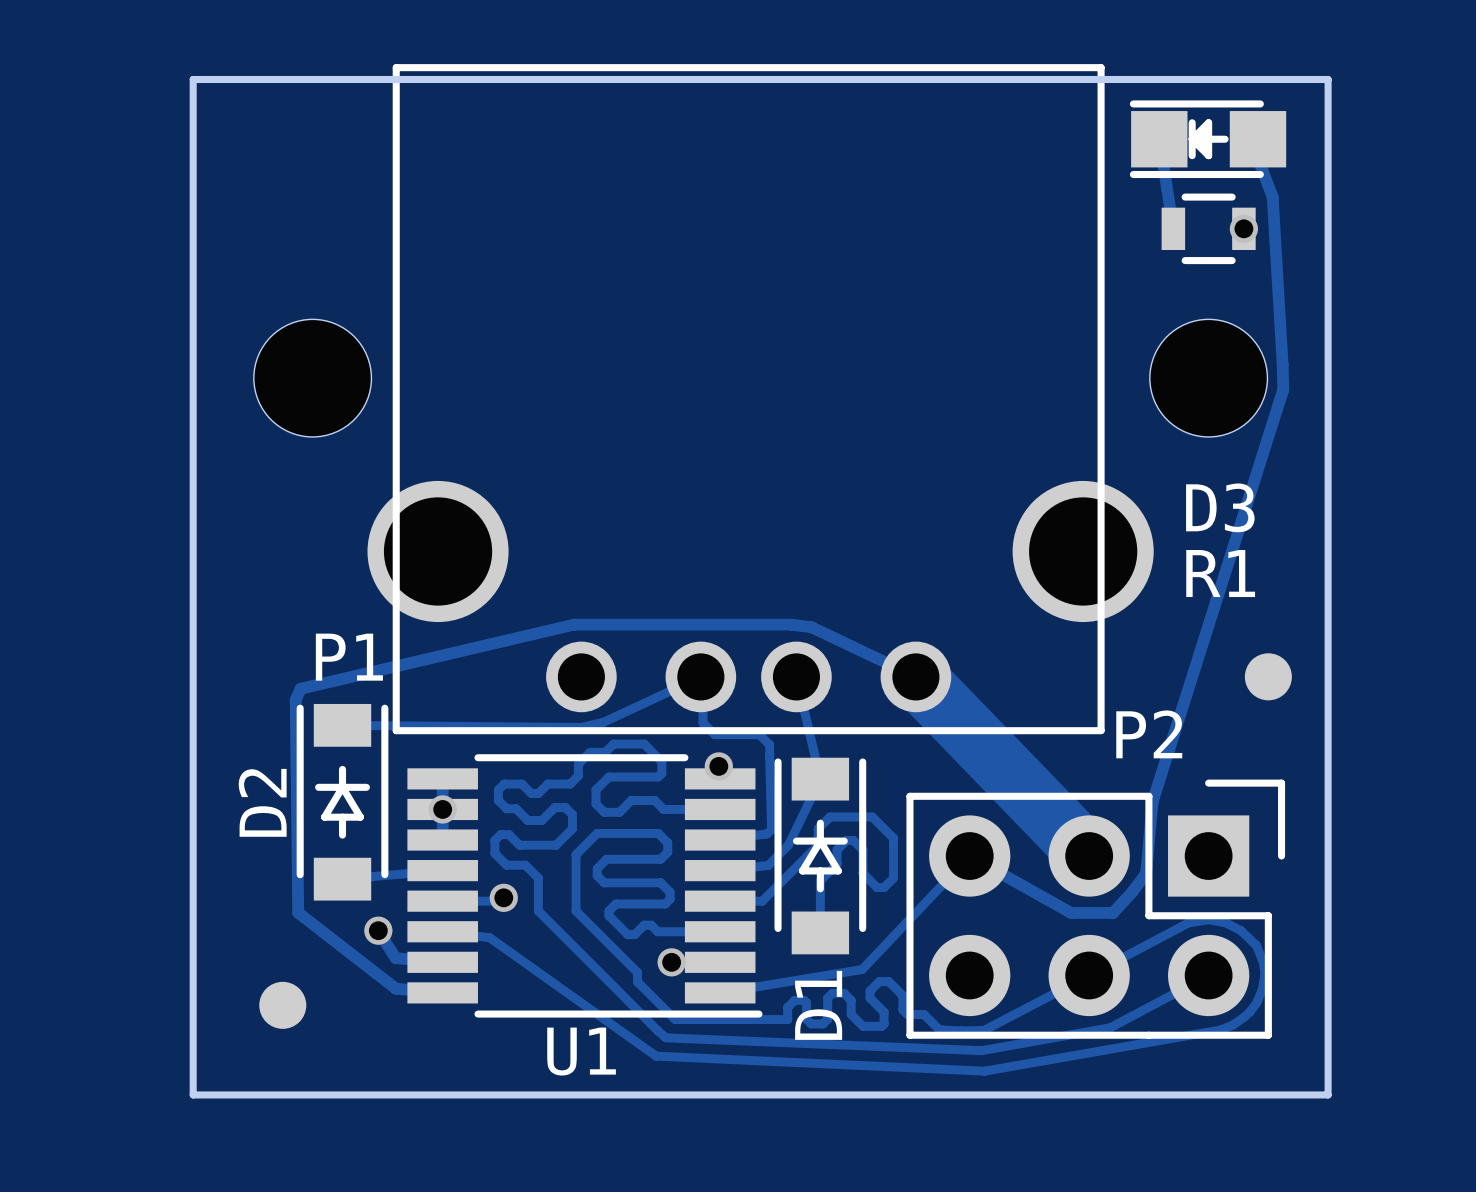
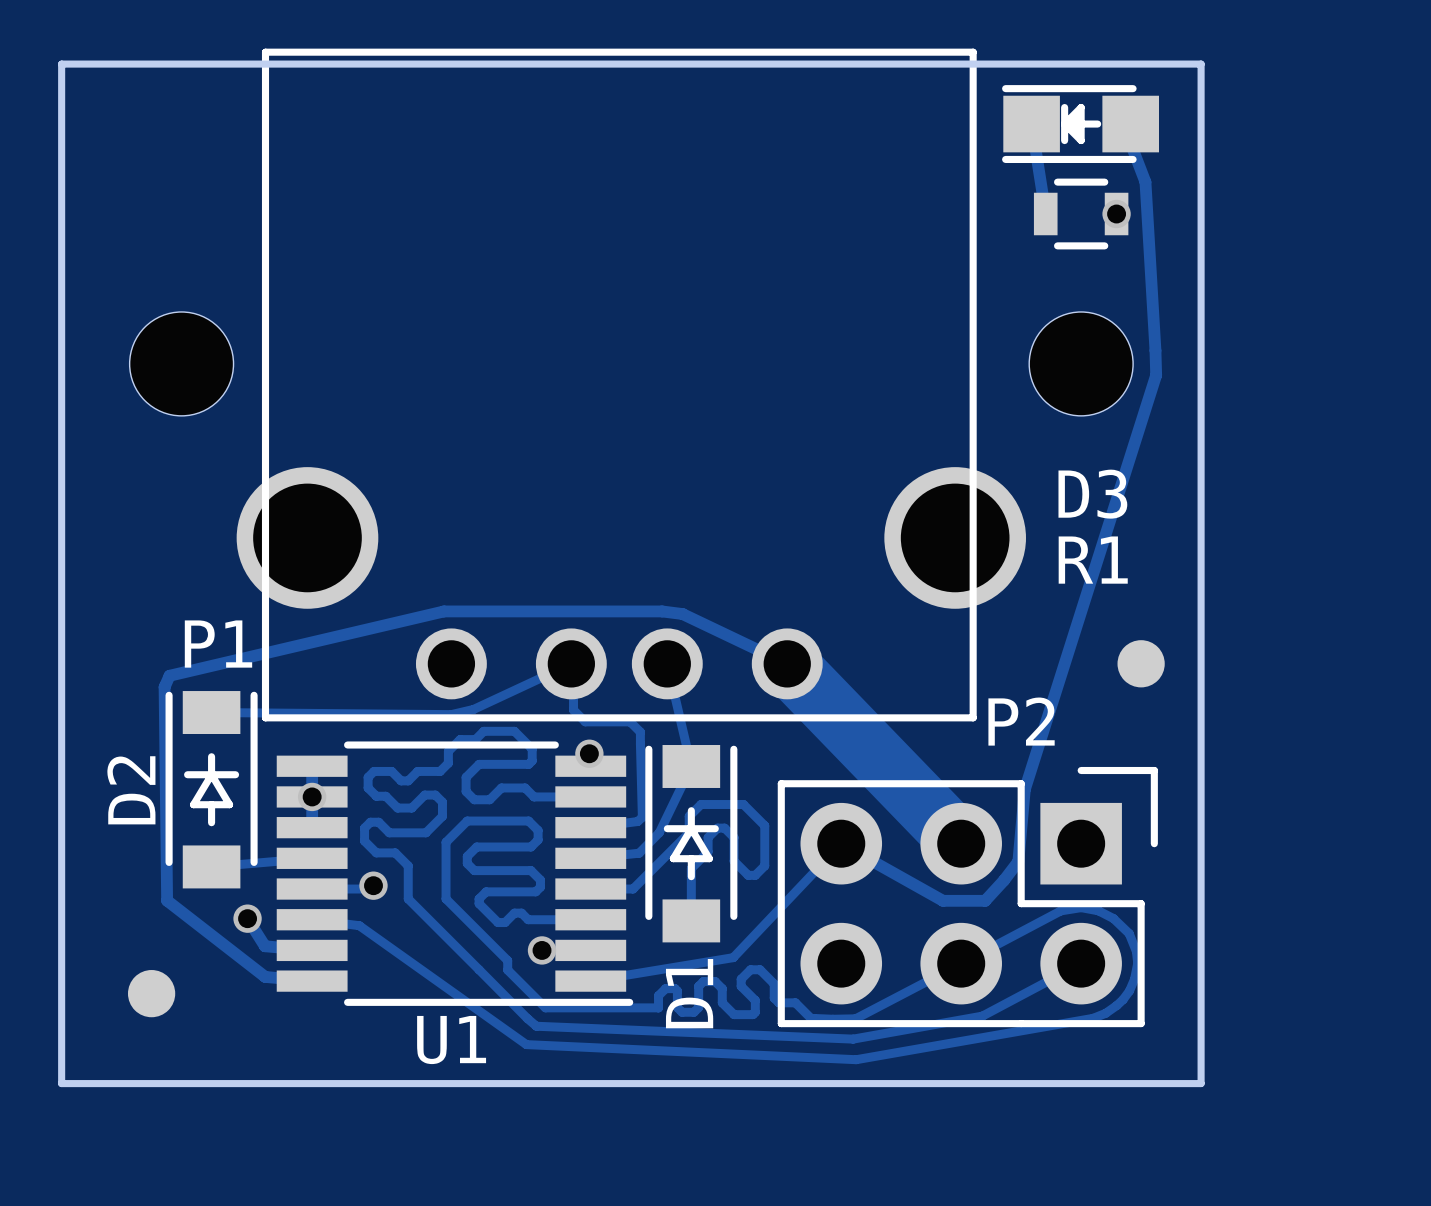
part footprint: [253, 319, 372, 437] -> [129, 311, 234, 416]
part footprint: [1149, 319, 1268, 437] -> [1029, 311, 1134, 416]

